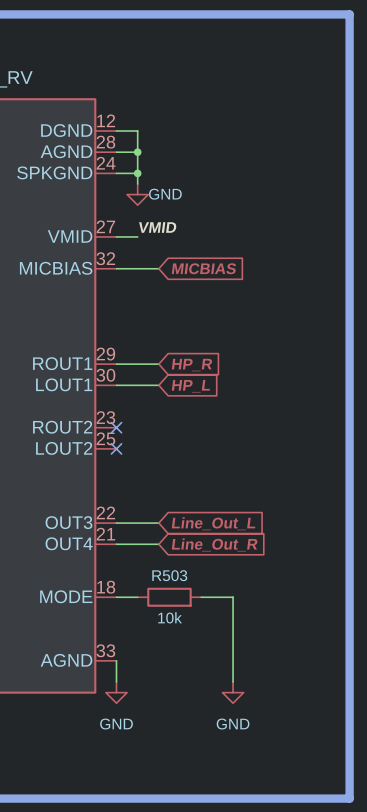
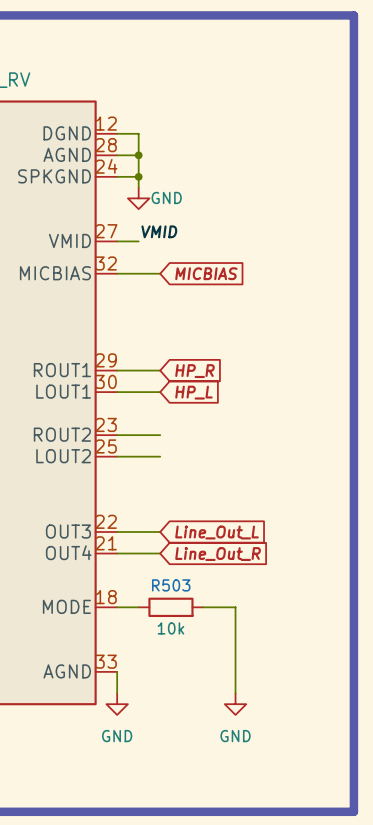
wire: none -> (117, 435) (160, 435)
no-connect mark: (116, 427) -> none
wire: none -> (117, 456) (160, 456)
no-connect mark: (116, 448) -> none

